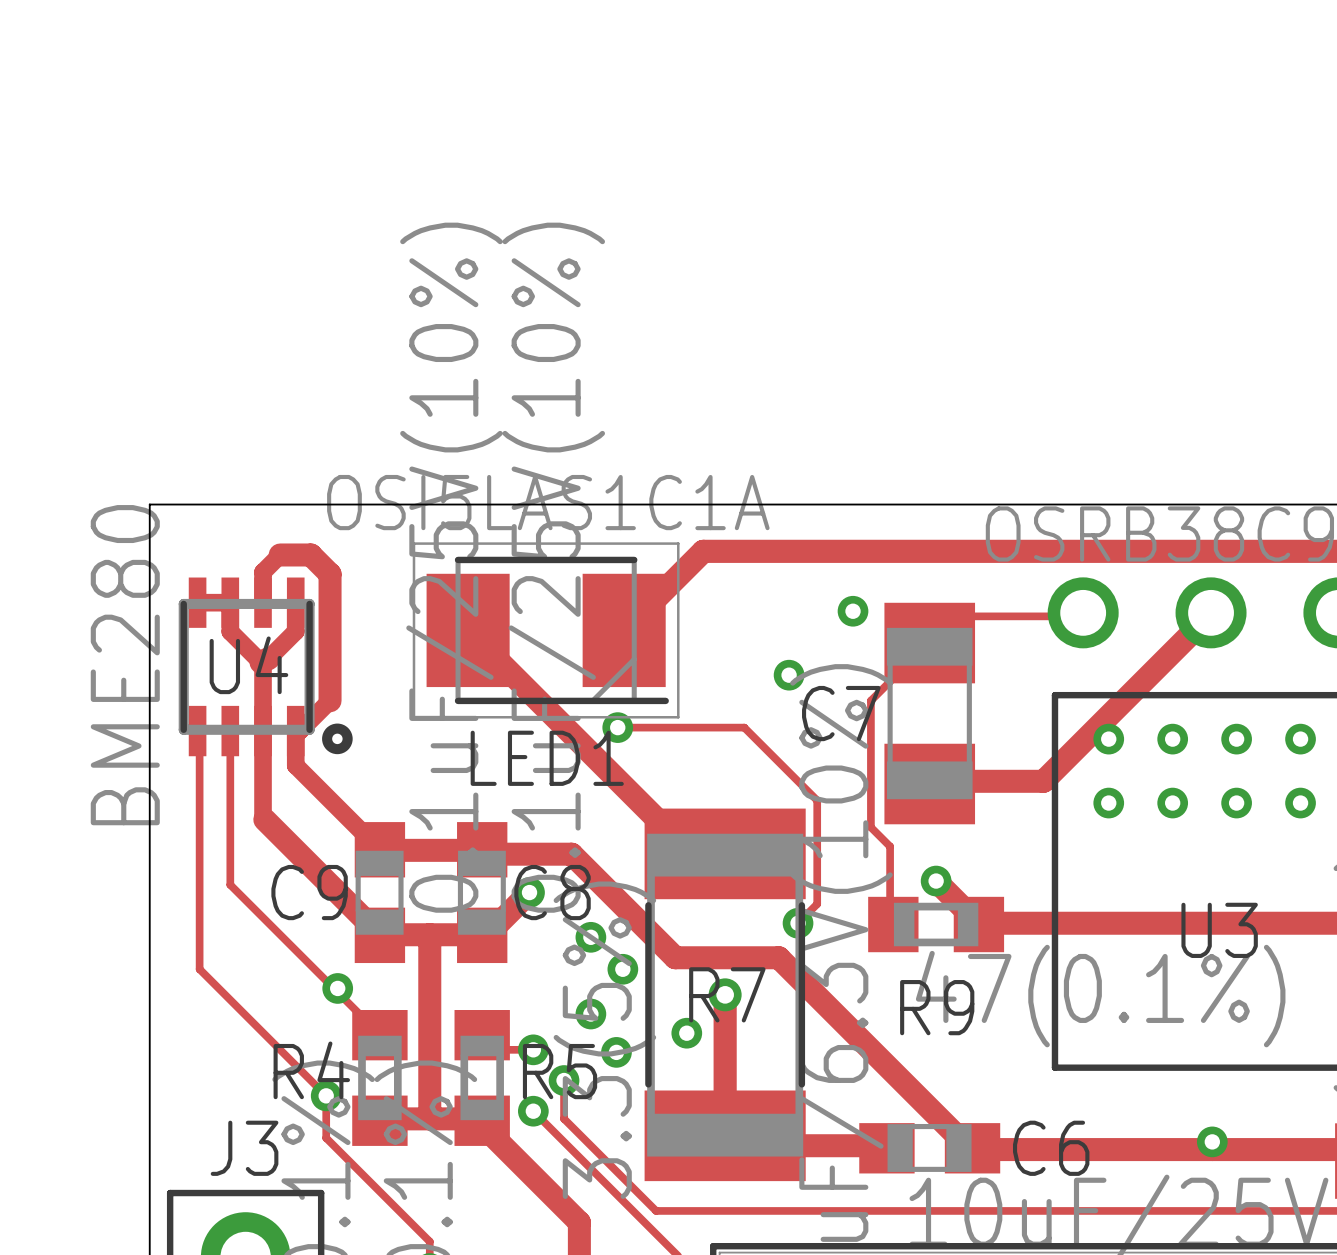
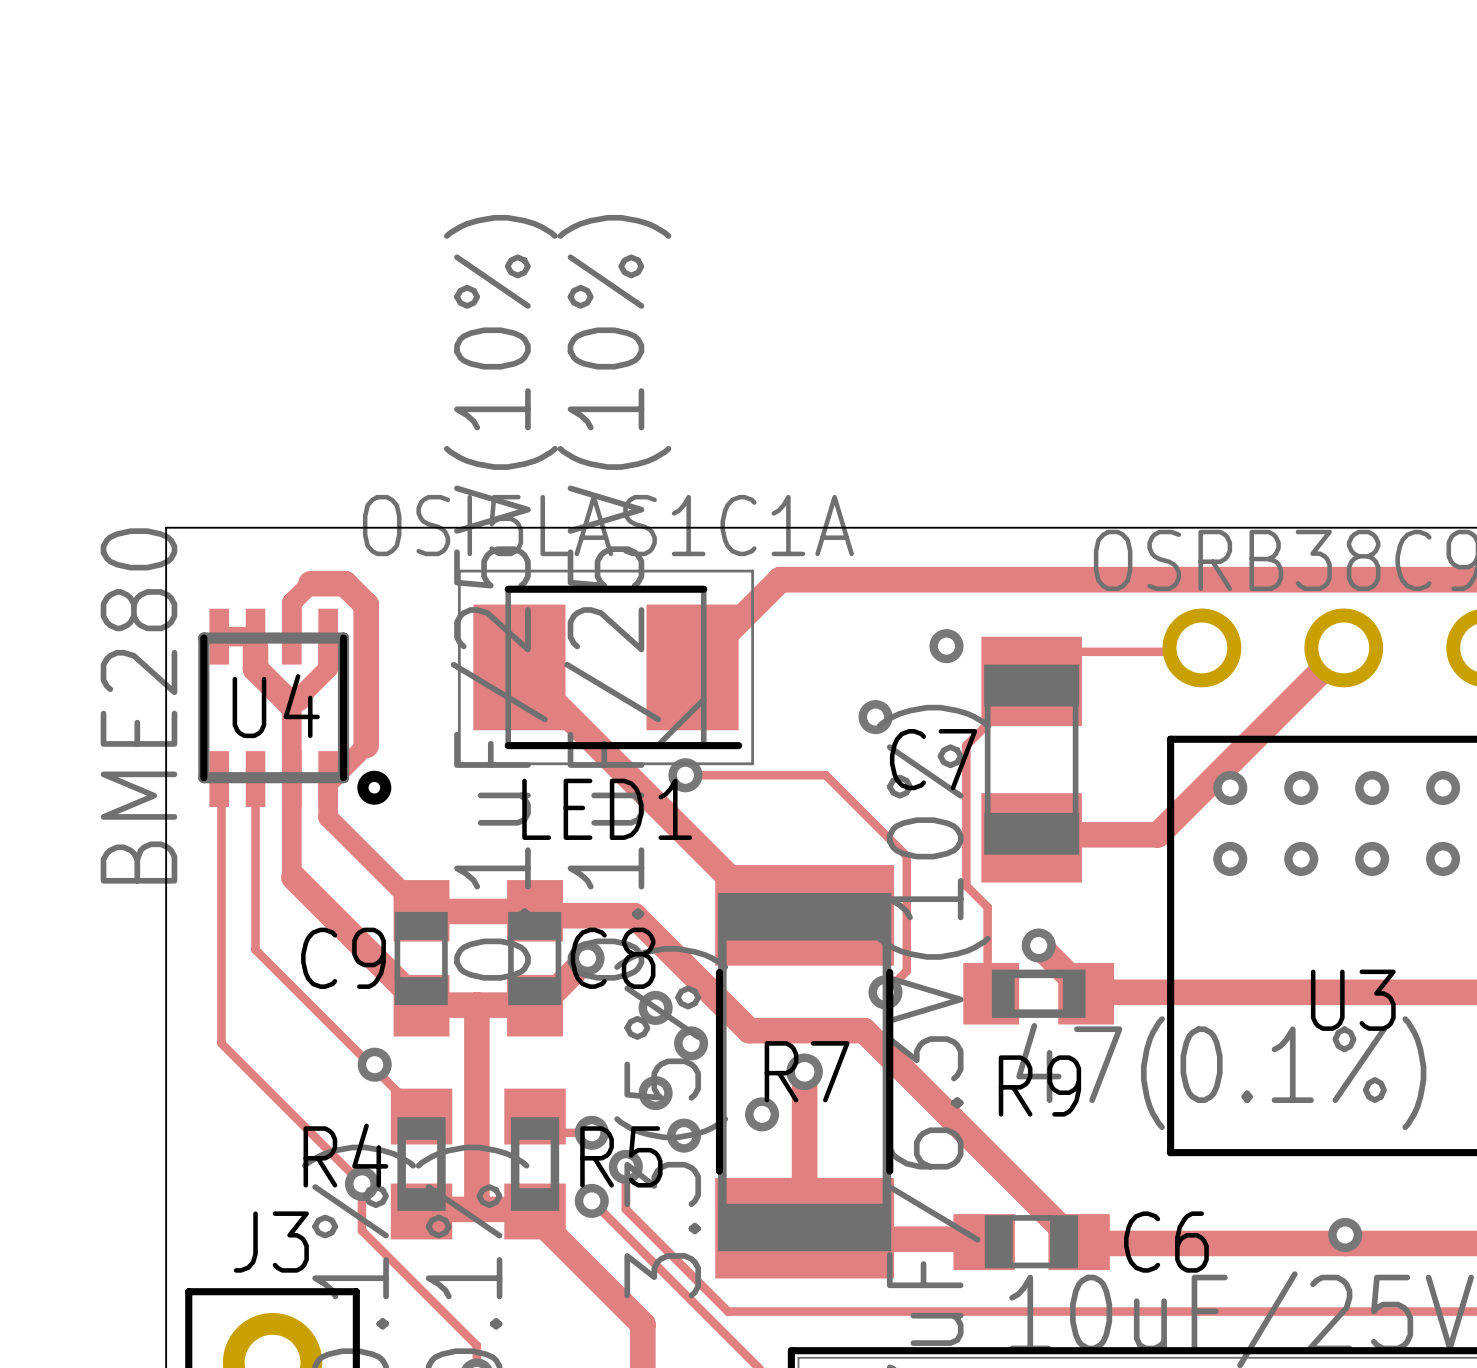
track width: thin (230, 602) (230, 631) (260, 662) -> thick (255, 636) (255, 668) (289, 702)

